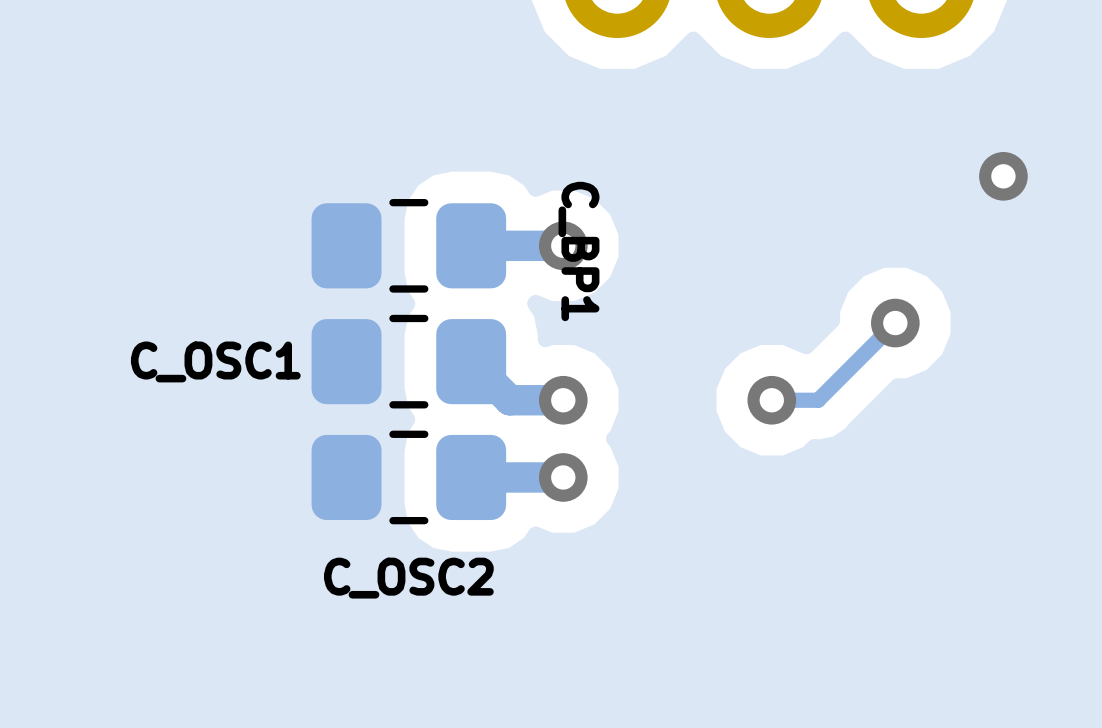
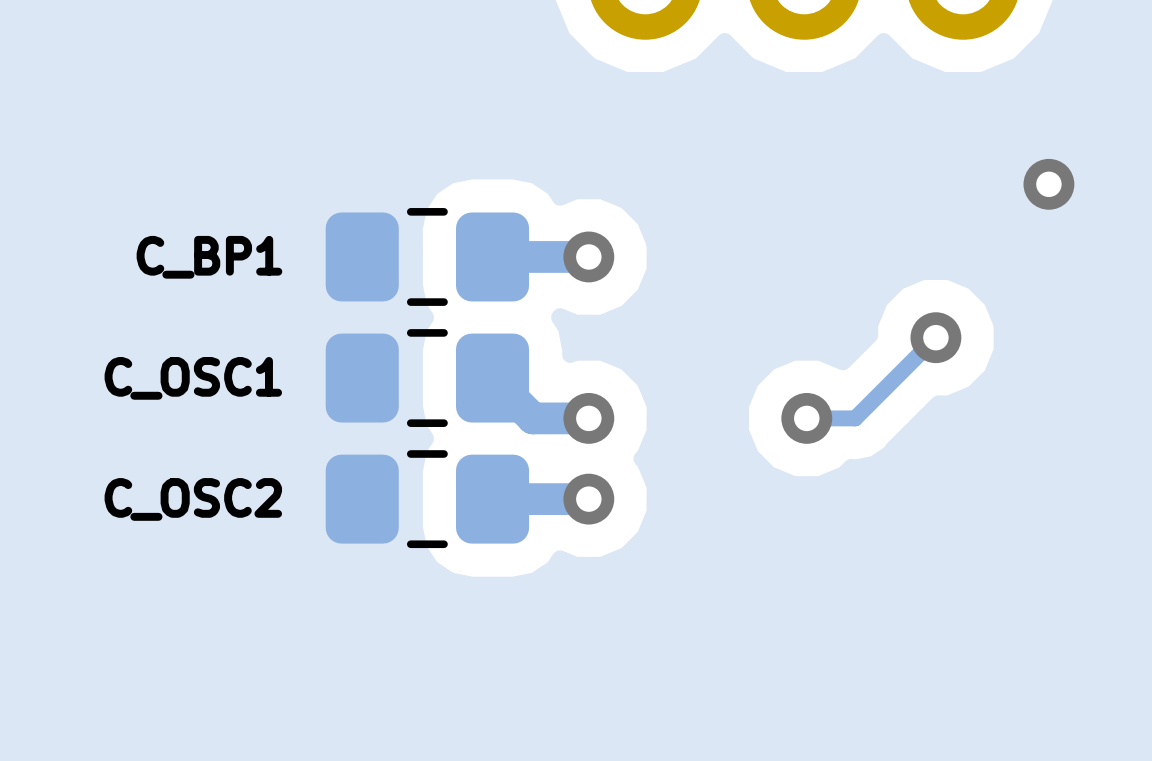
C_BP1 name rotation: 0° (578, 251) -> 90° counterclockwise (209, 257)
C_BP1 name position: C_BP1 (578, 251) -> C_BP1 (209, 257)
C_OSC1 name position: C_OSC1 (215, 361) -> C_OSC1 (193, 378)
C_OSC2 name position: C_OSC2 (408, 578) -> C_OSC2 (193, 499)

